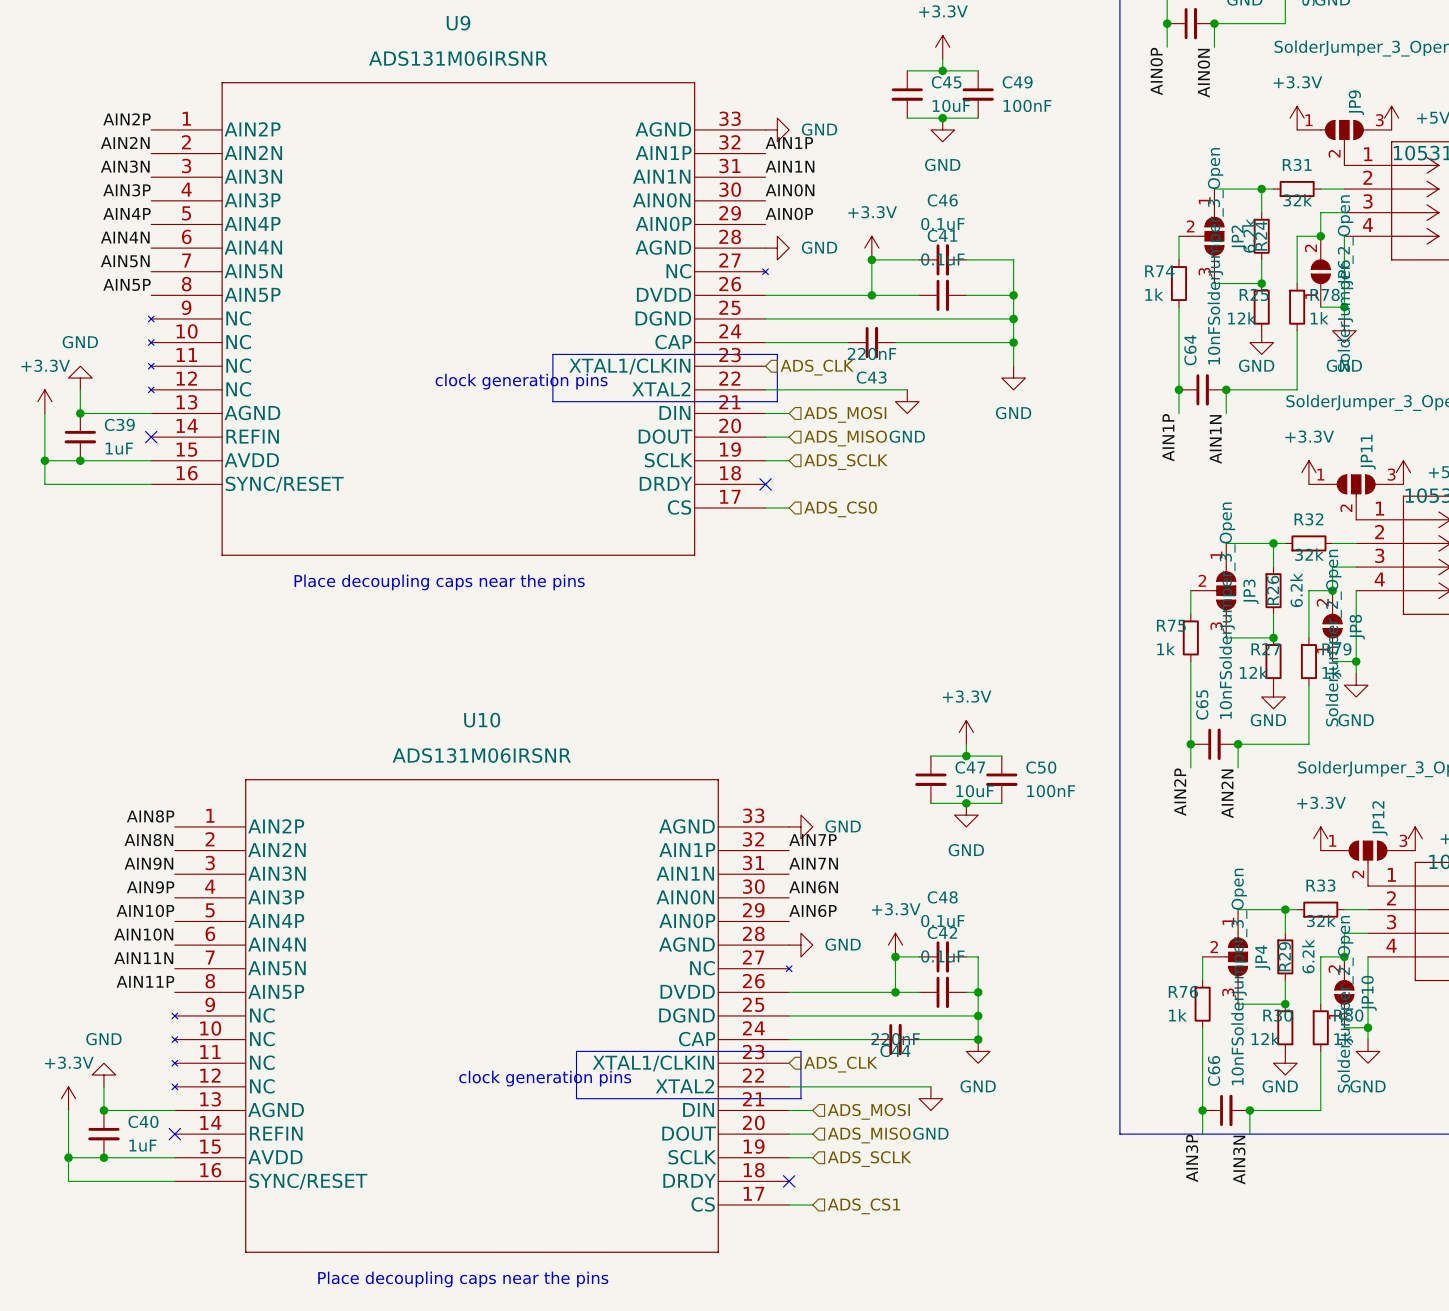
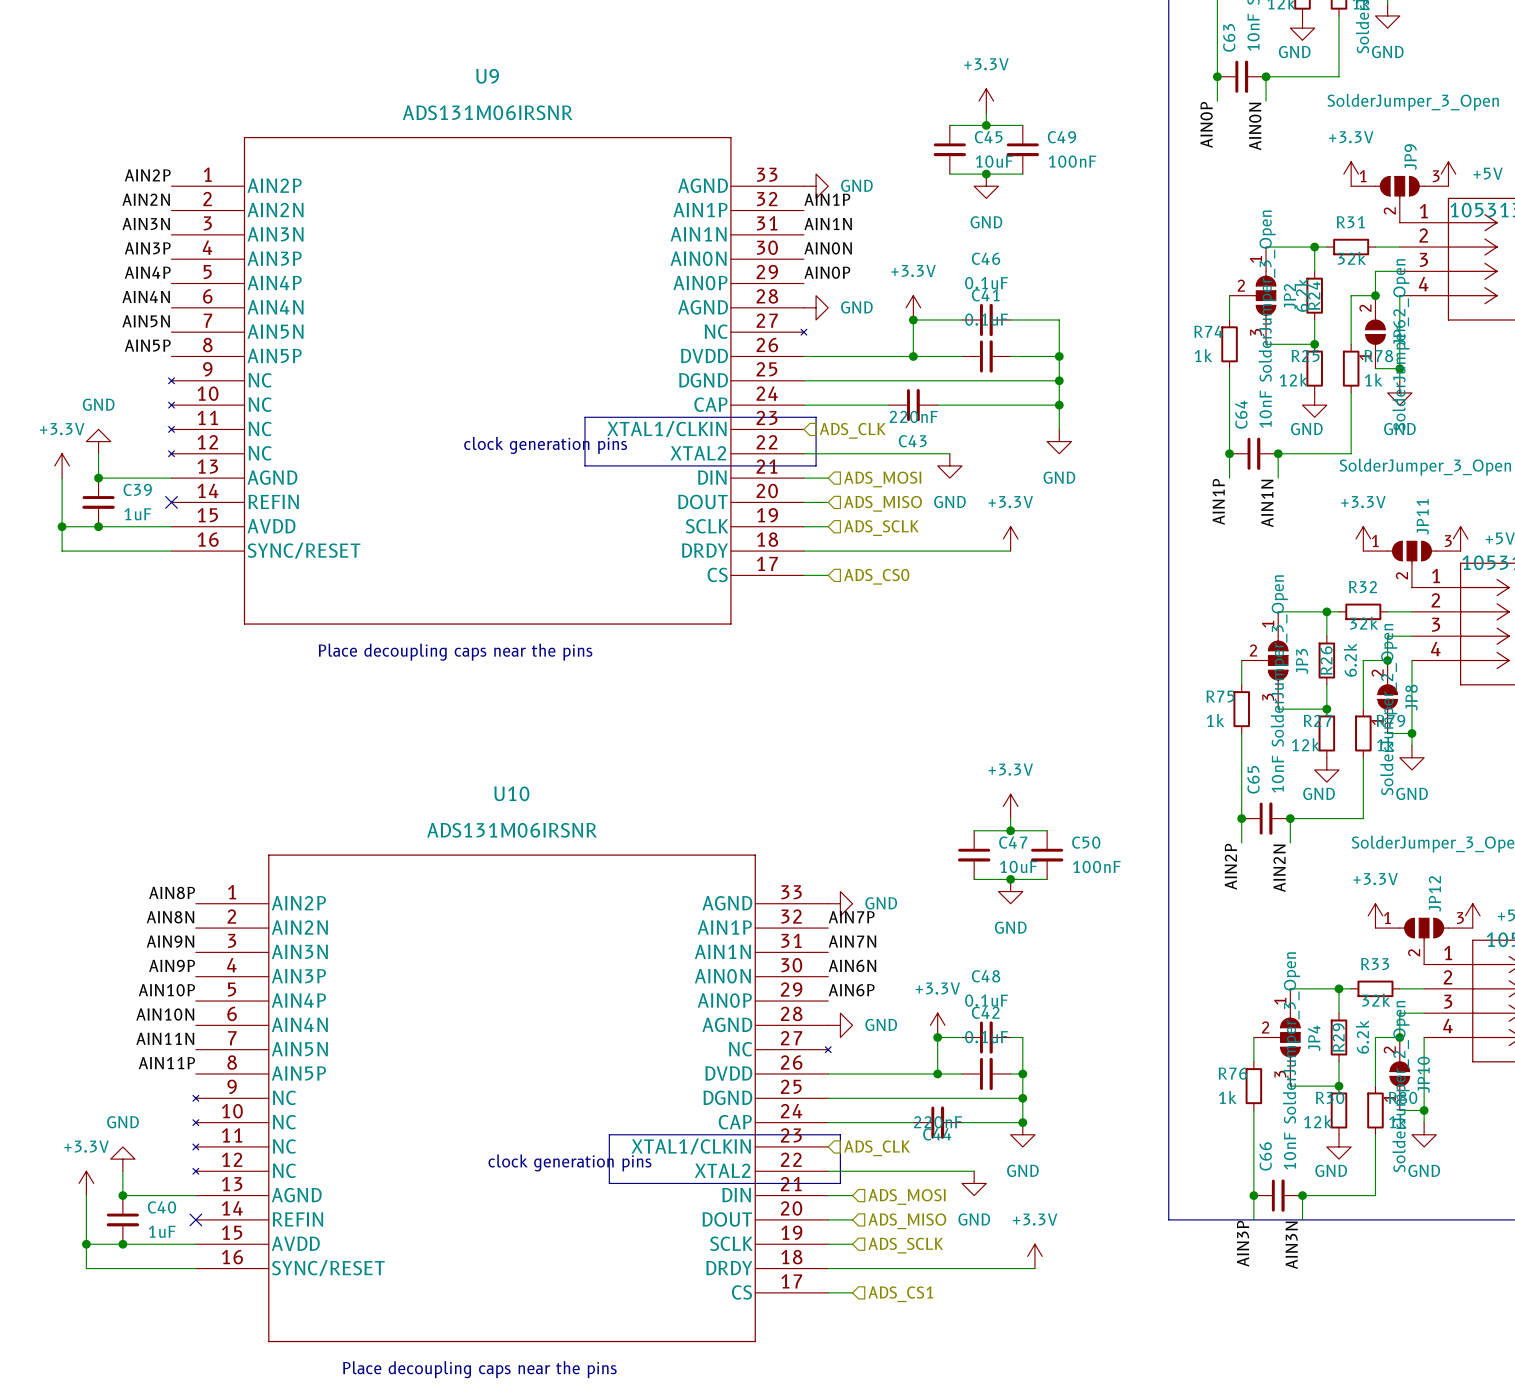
power symbol: none -> +3.3V (1010, 538)
wire: none -> (803, 551) (1010, 551)
no-connect mark: (765, 484) -> none
power symbol: none -> +3.3V (1034, 1256)
wire: none -> (828, 1268) (1034, 1268)
no-connect mark: (789, 1181) -> none

